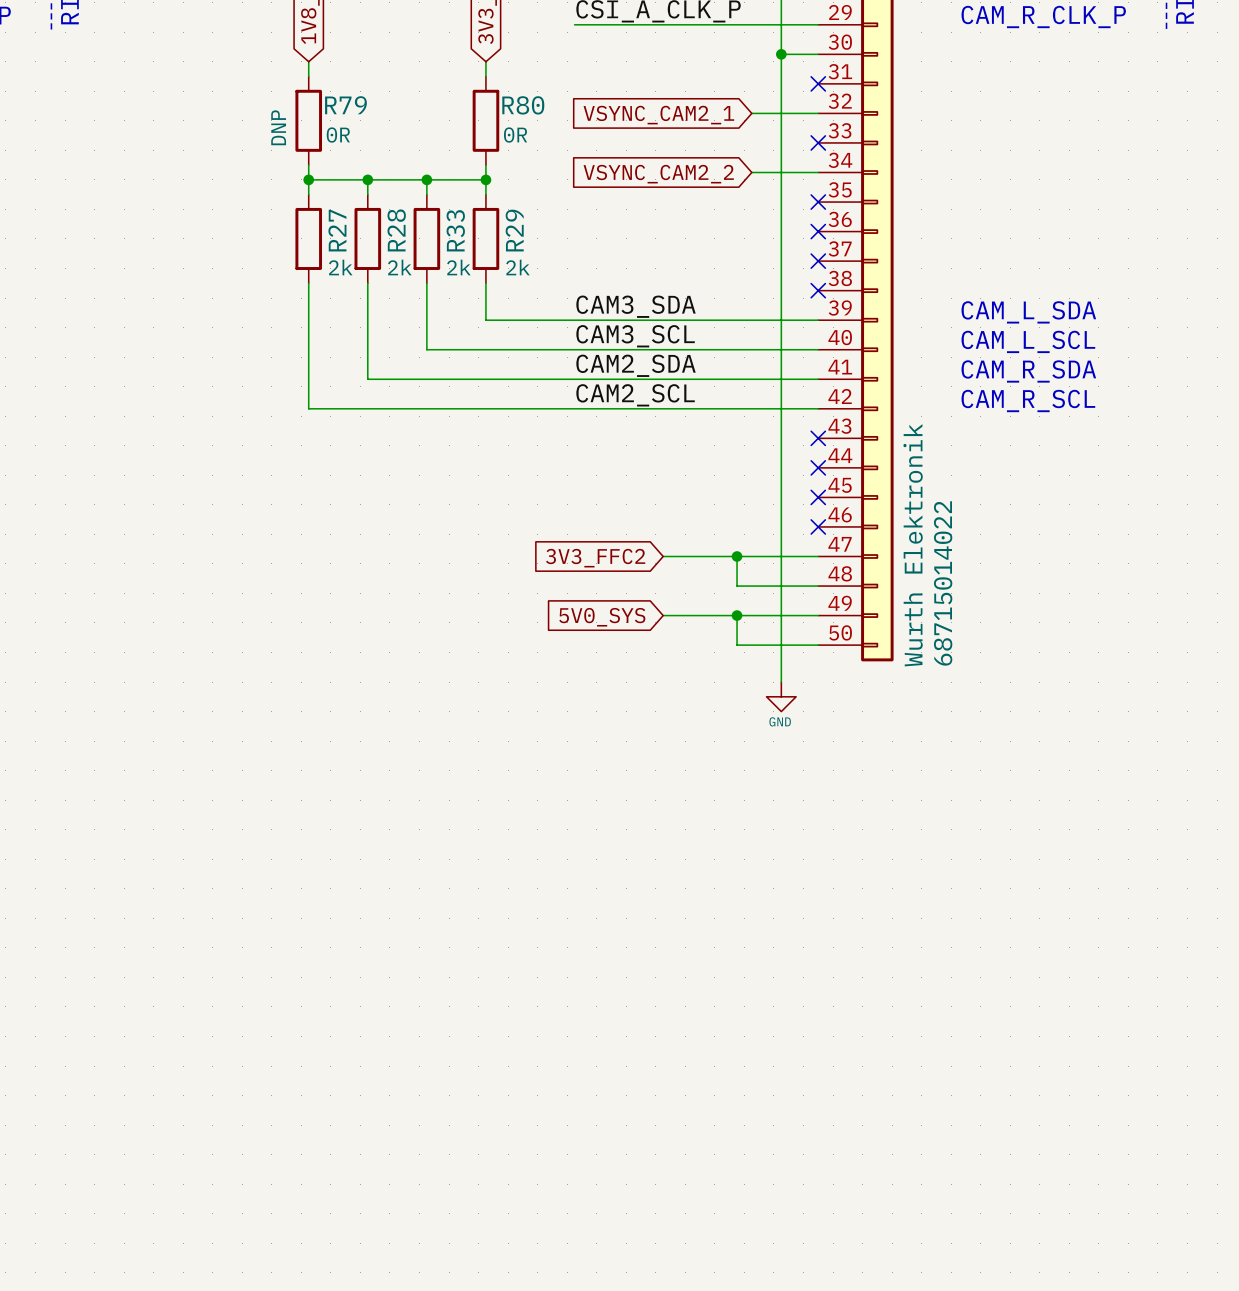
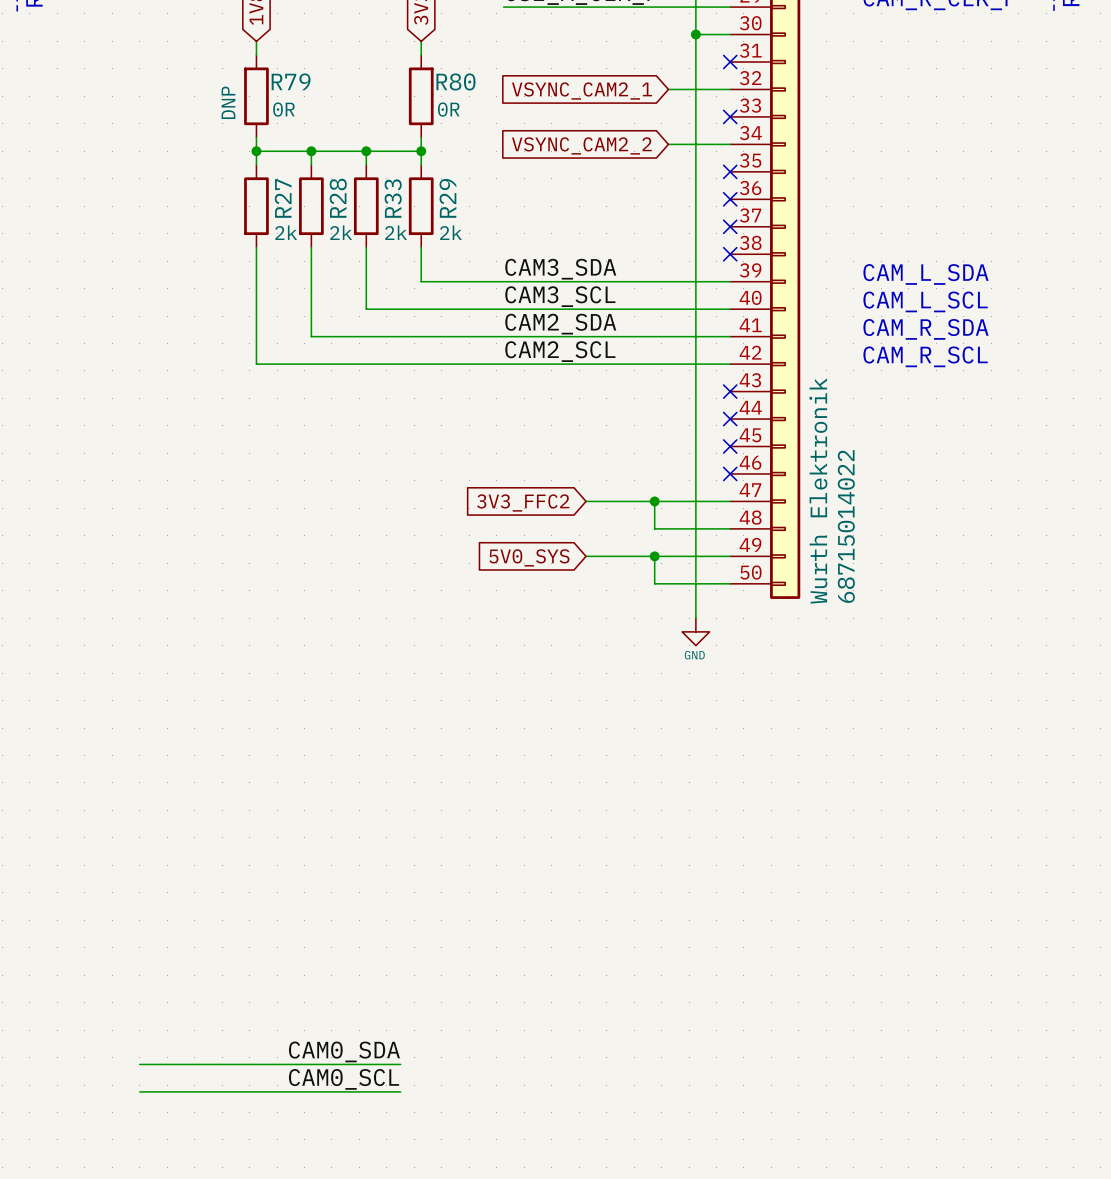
label: none -> CAM0_SDA (344, 1051)
wire: none -> (139, 1064) (400, 1064)
label: none -> CAM0_SCL (344, 1079)
wire: none -> (139, 1091) (400, 1091)

